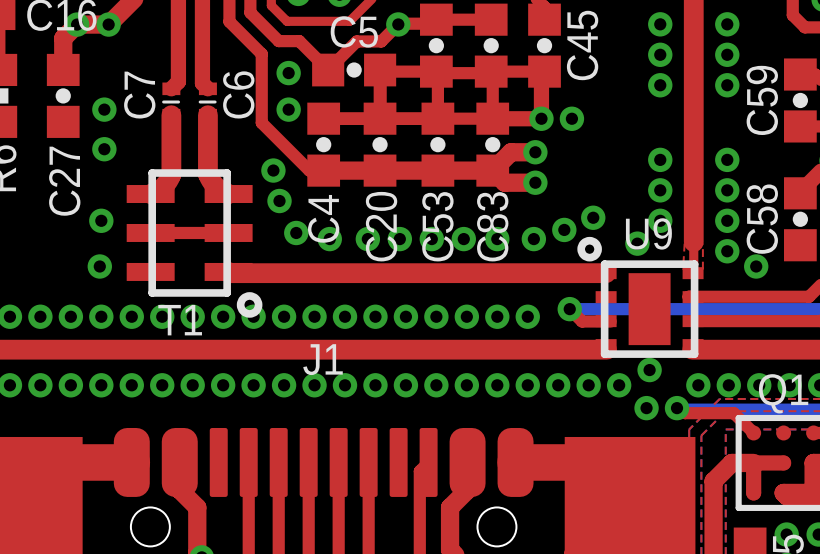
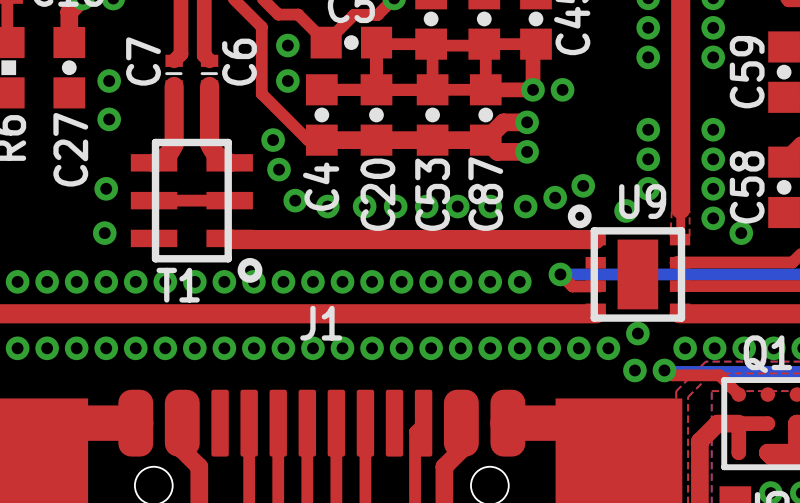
C83 name: C83 (492, 226) -> C87 (485, 194)

